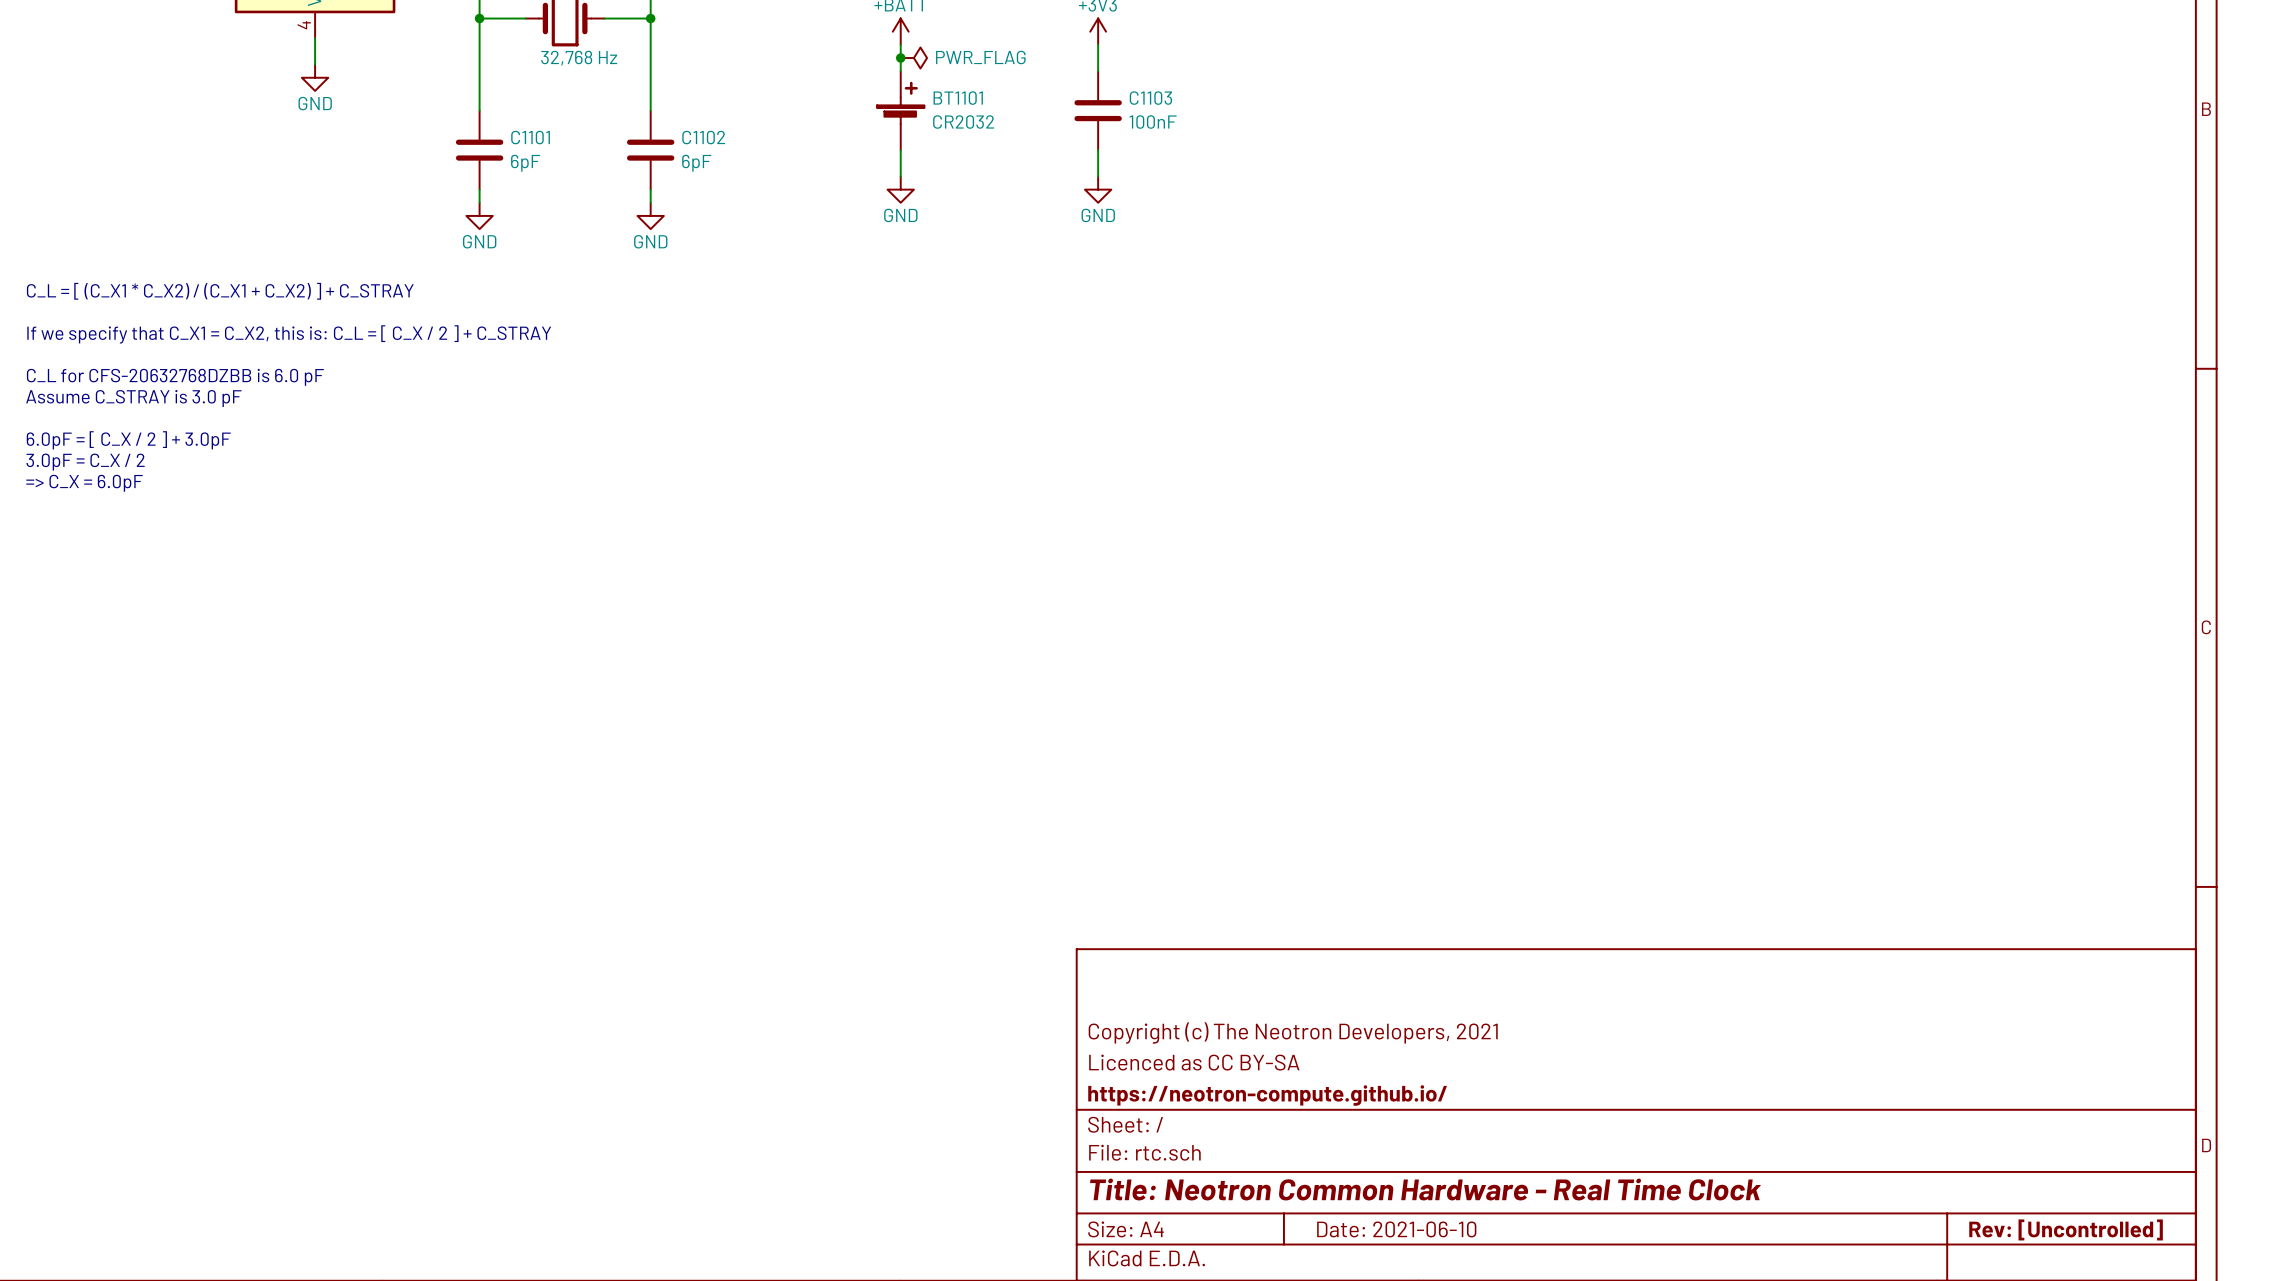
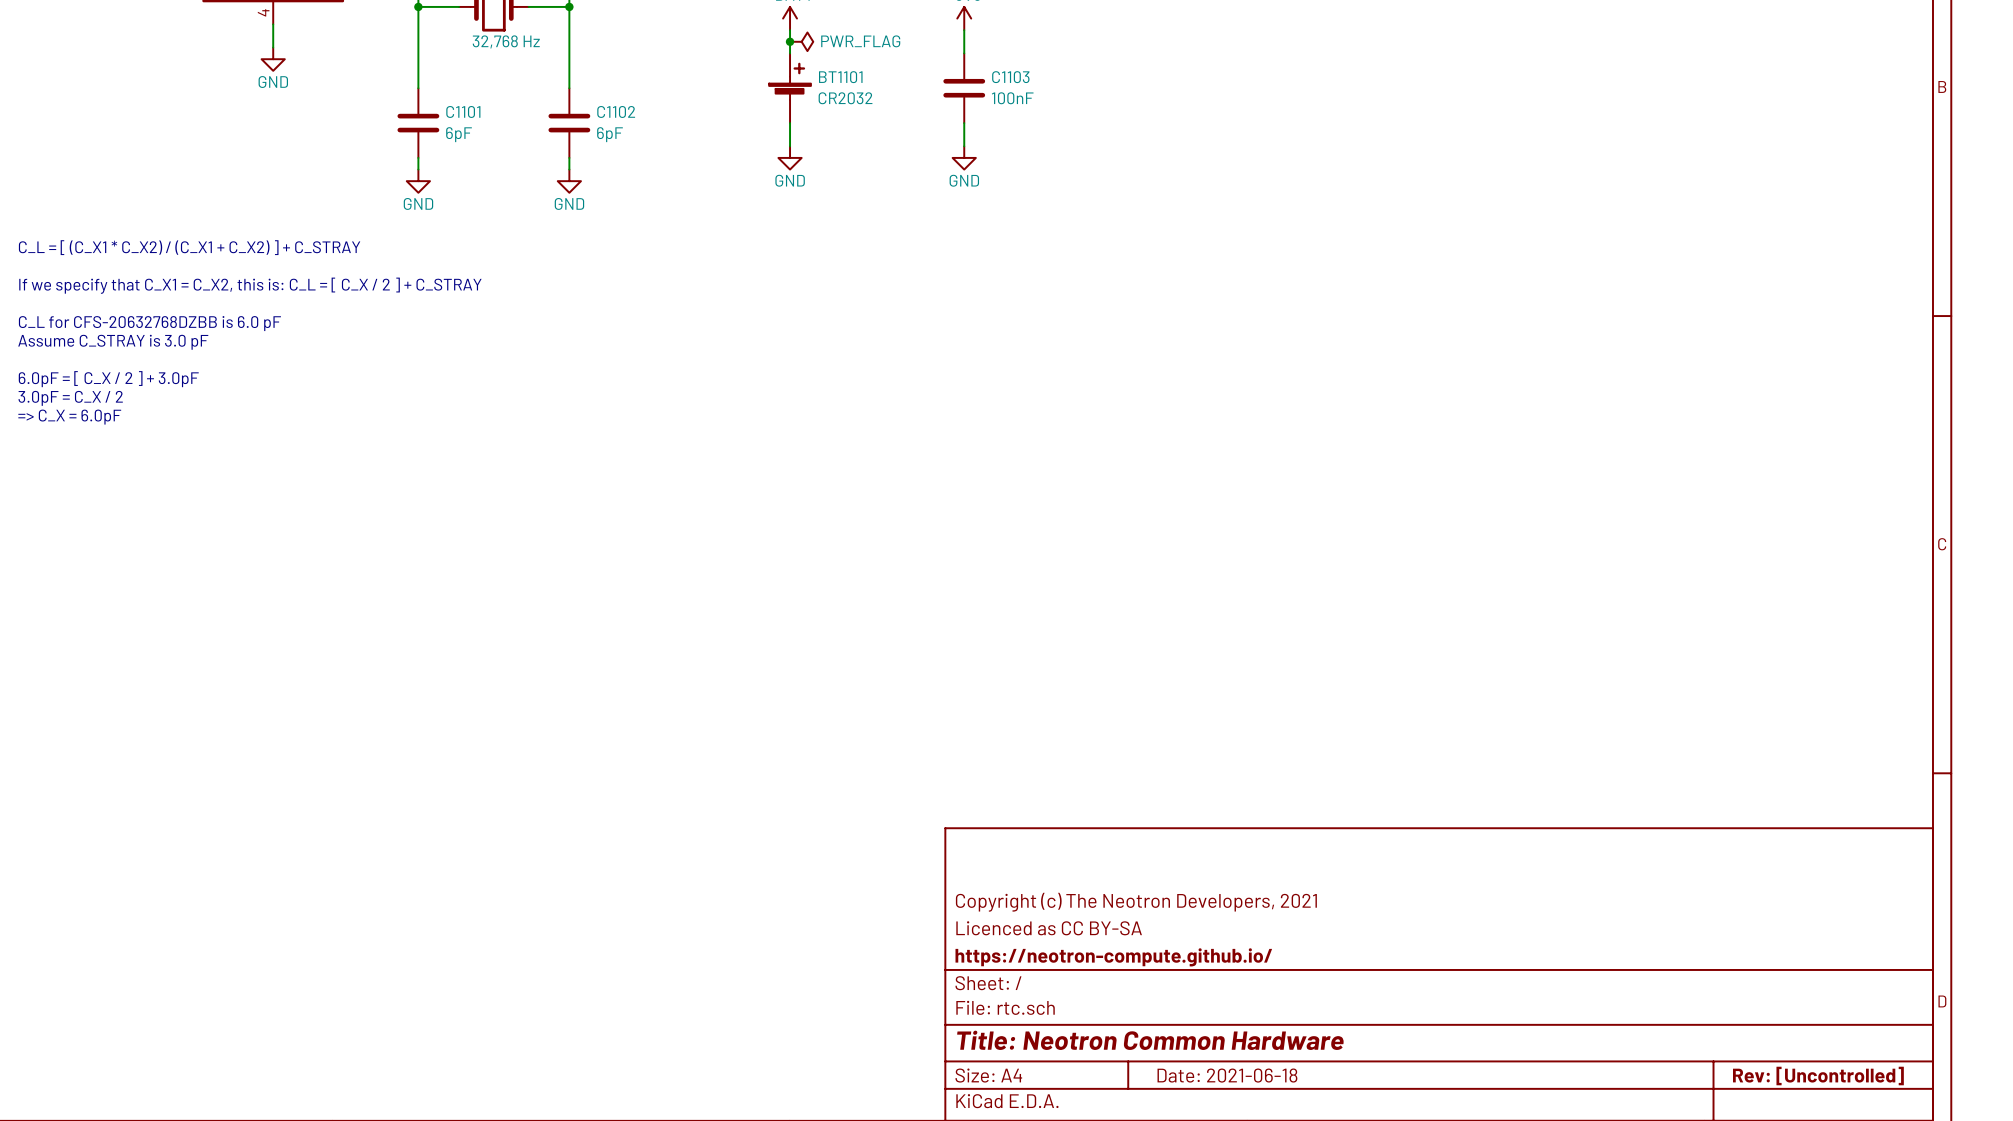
title block: Title: Neotron Common Hardware - Real Time Clock (1425, 1189) -> Title: Neotron Common Hardware (1150, 1040)
title block: Date: 2021-06-10 (1396, 1229) -> Date: 2021-06-18 (1227, 1075)

